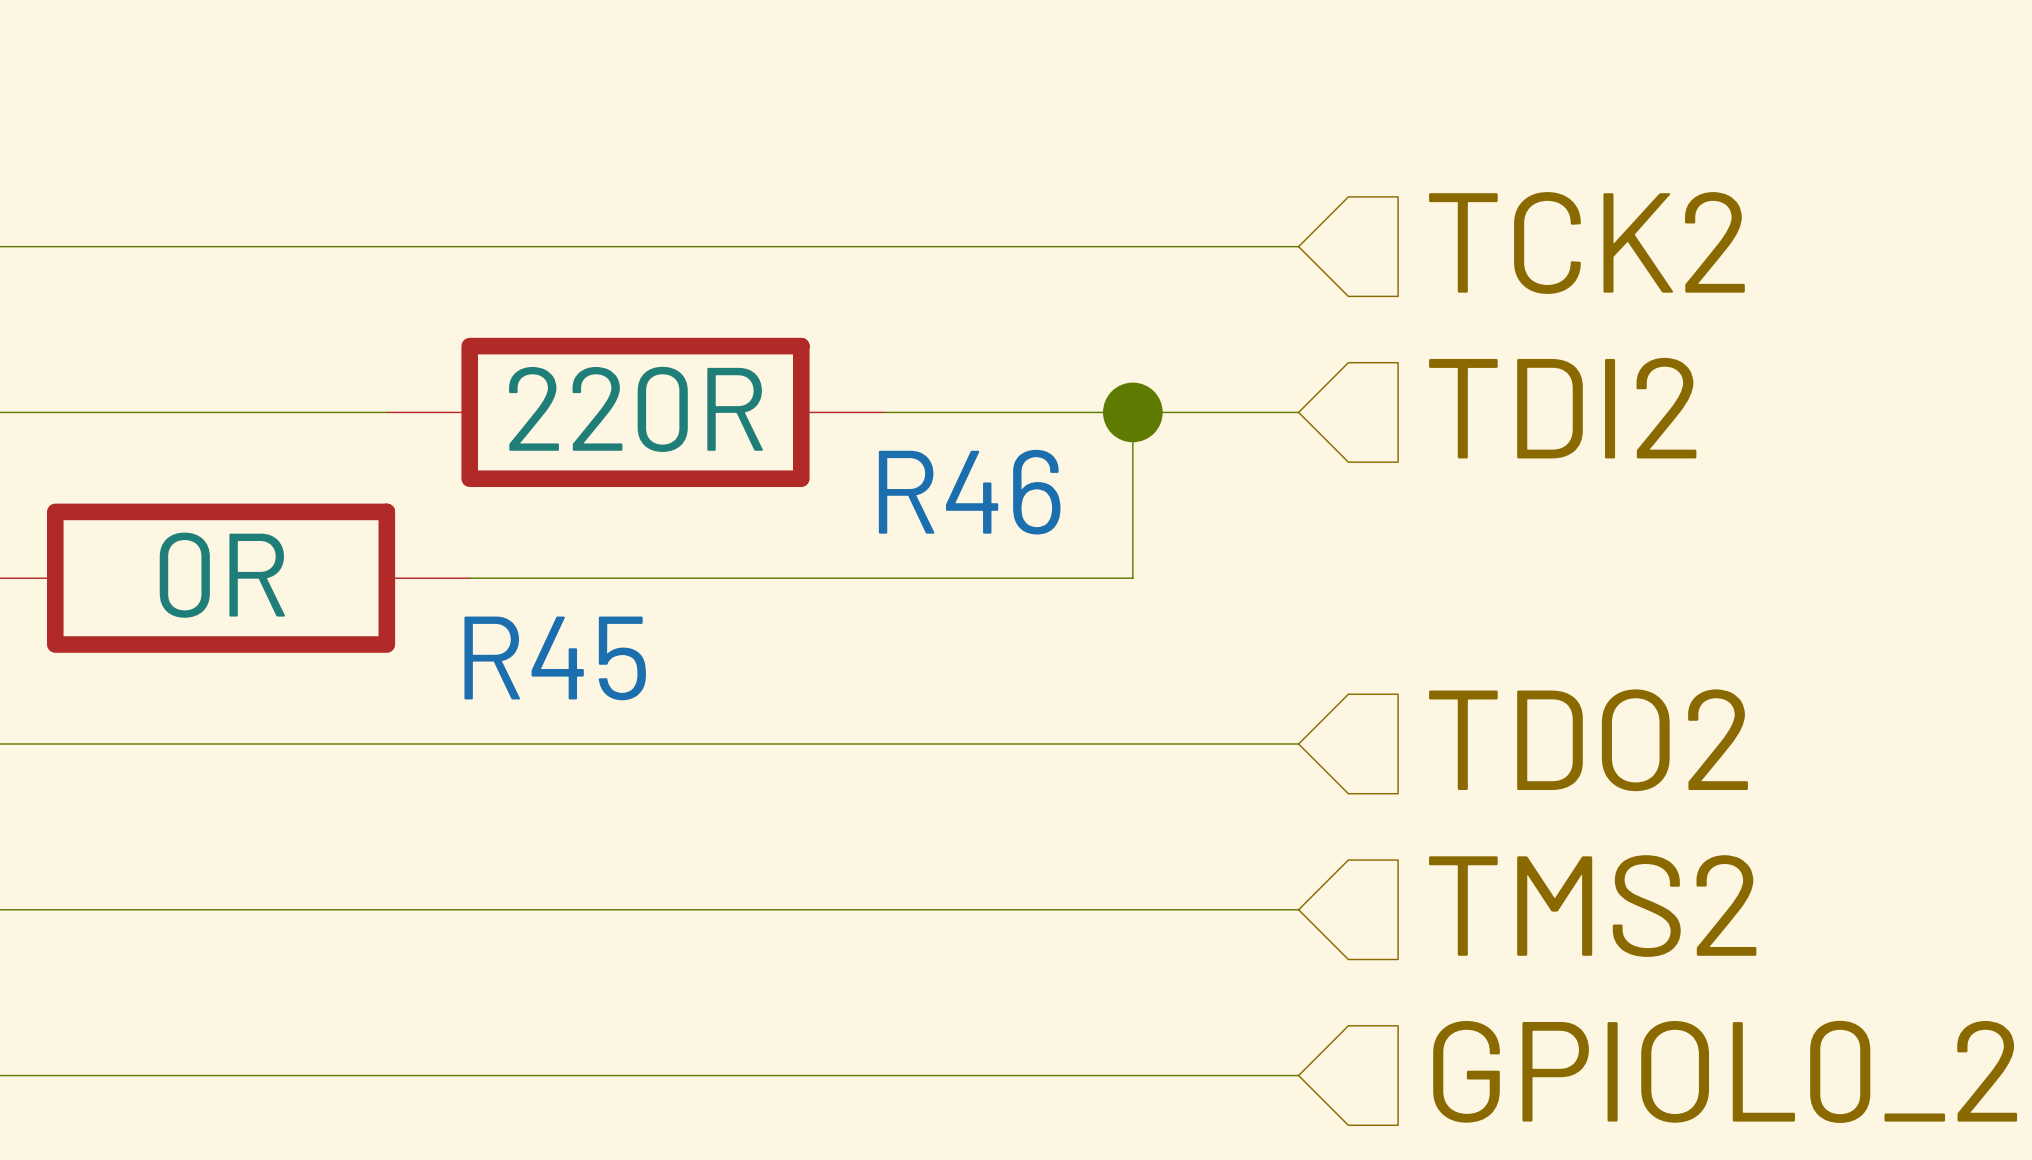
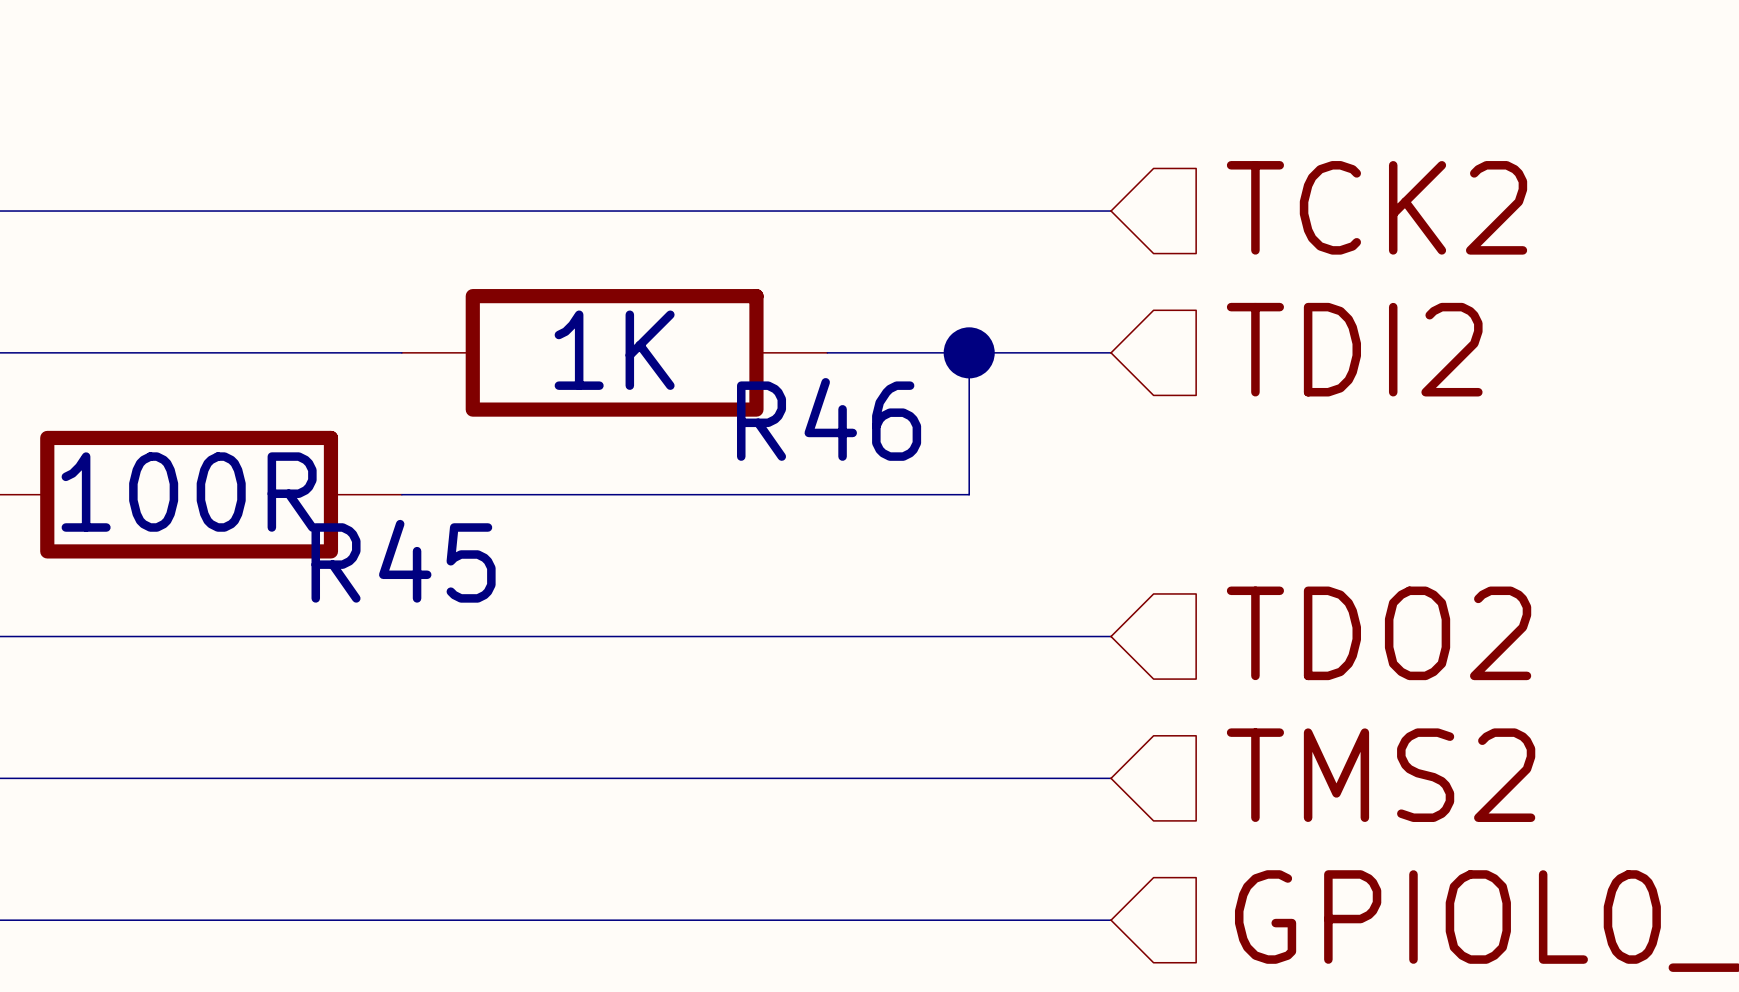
R46 value: 220R (635, 409) -> 1K (614, 350)
R46 position: (635, 412) -> (614, 352)
R45 value: 0R (222, 575) -> 100R (189, 492)
R45 name position: R45 (555, 658) -> R45 (403, 561)

